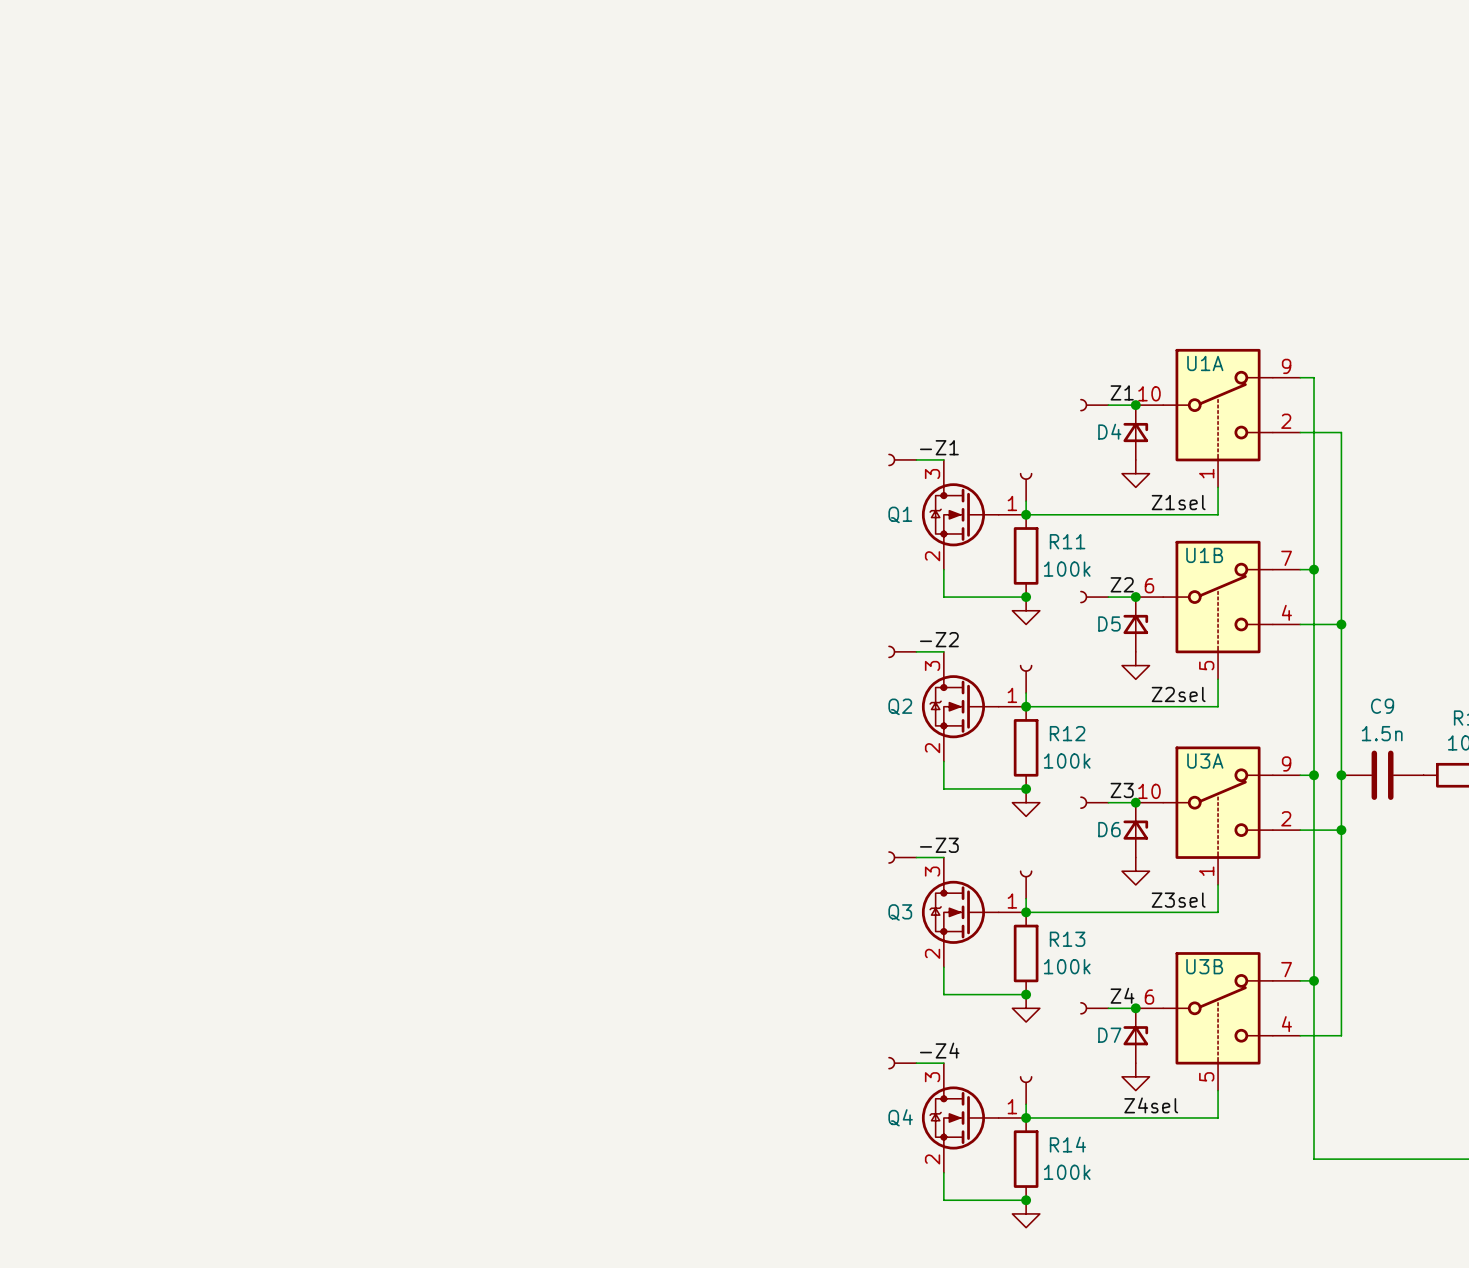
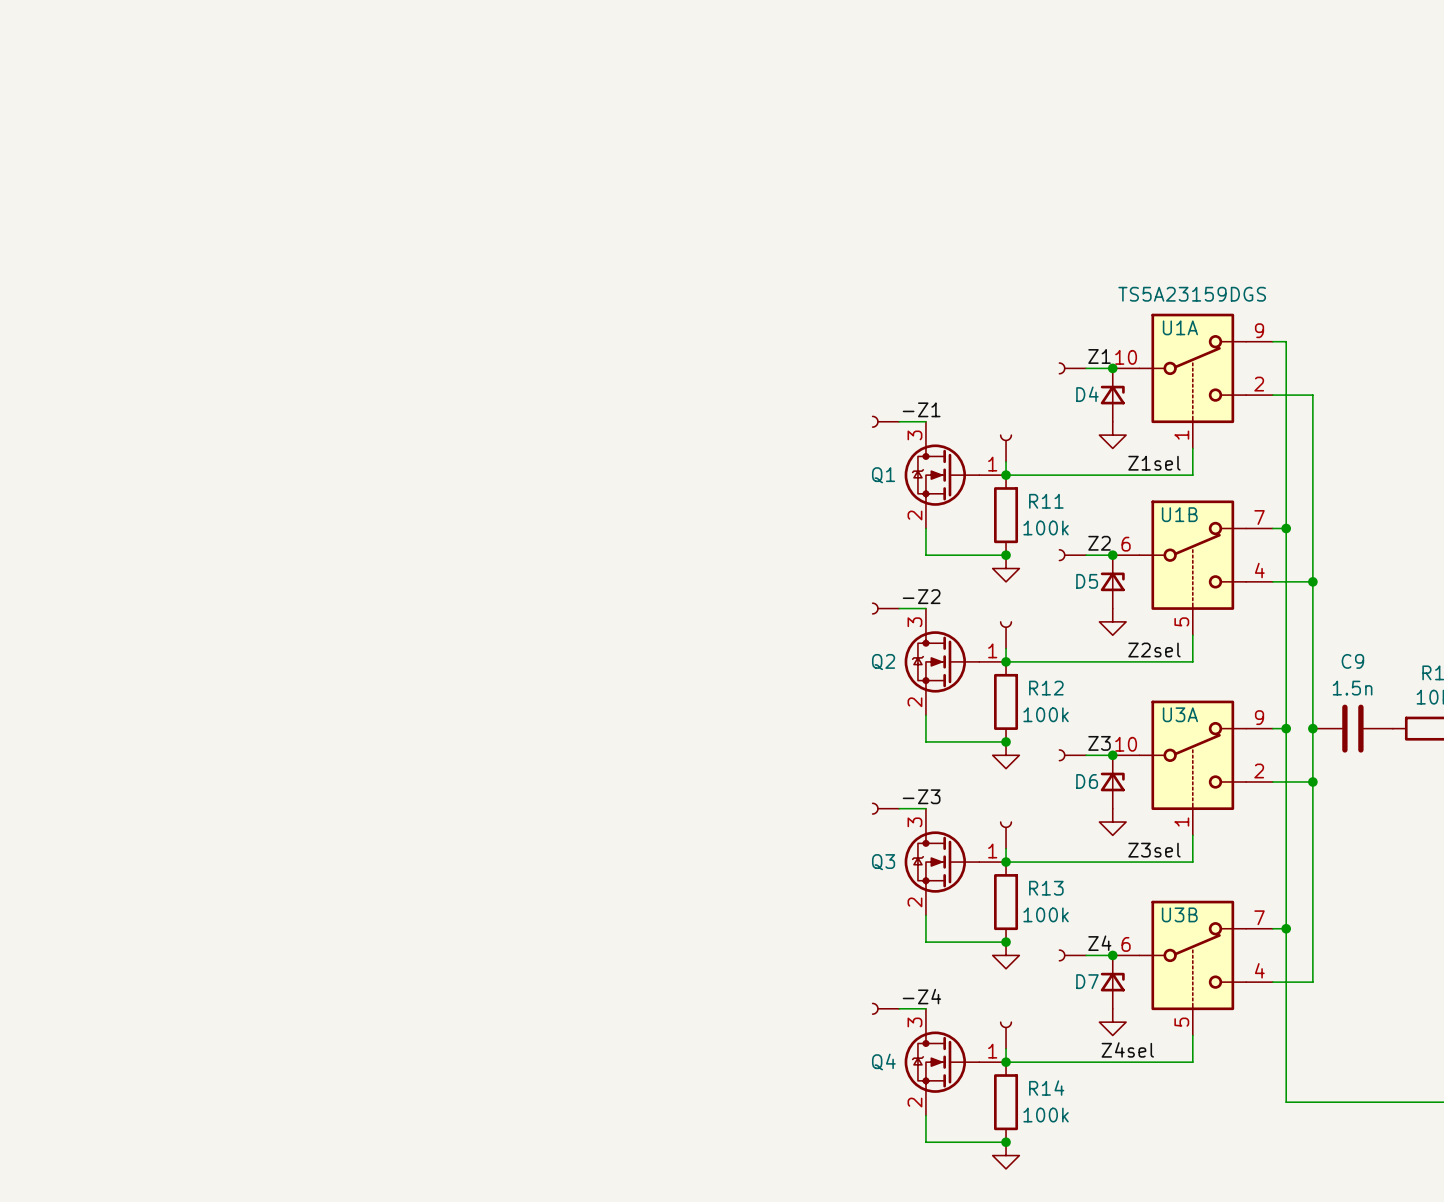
U1A value: none -> TS5A23159DGS (1192, 294)

